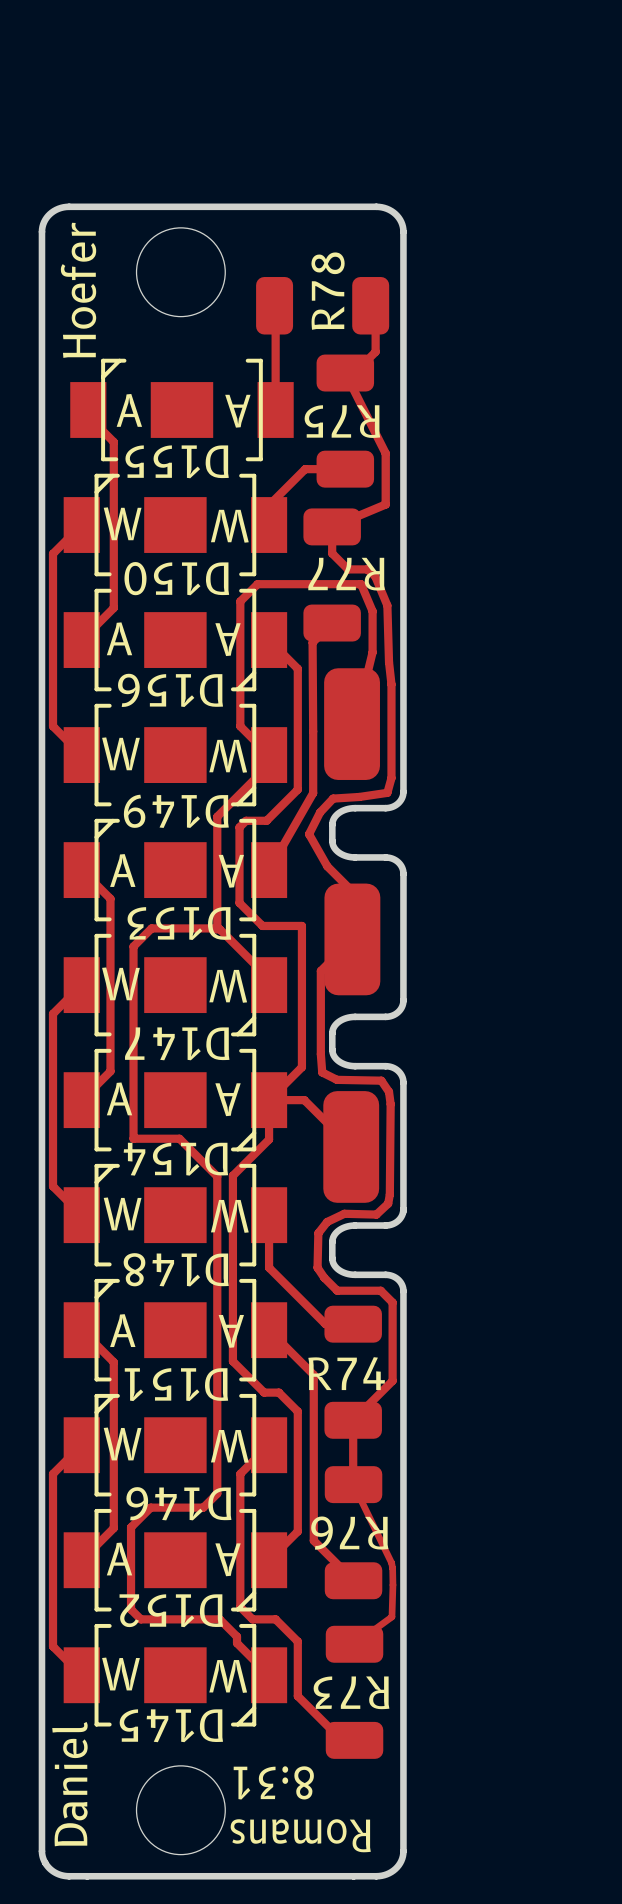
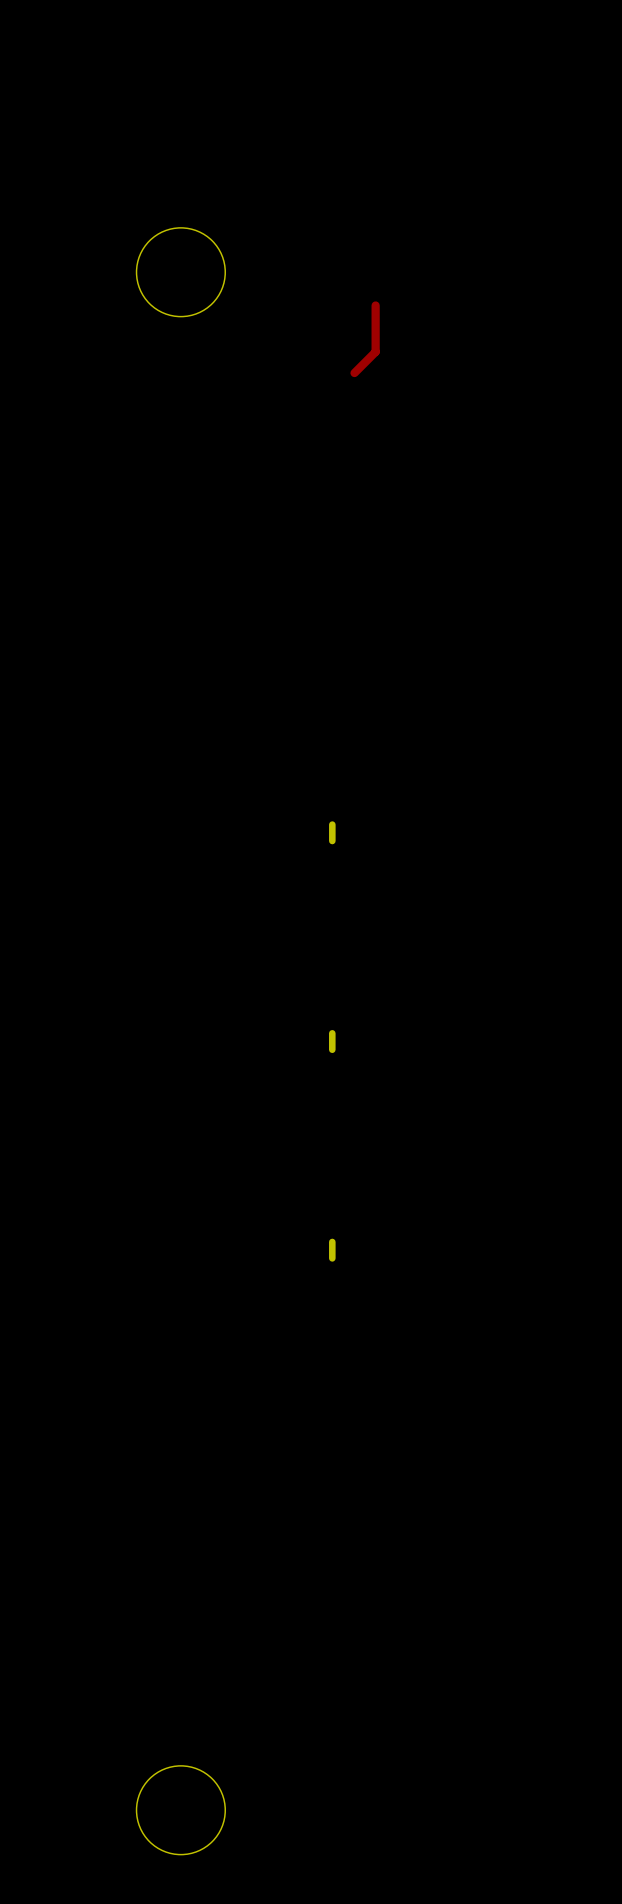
text: Hoefer (78, 290) -> none
R78: (322, 305) -> none
track: (275, 309) (275, 410) -> none
track: (345, 373) (385, 453) (385, 504) (332, 526) (332, 553) (348, 569) (367, 569) (375, 575) (387, 605) (391, 684) (391, 778) (387, 792) (333, 798) (320, 812) (309, 834) (327, 866) (352, 891) (352, 939) (320, 970) (322, 1072) (337, 1079) (381, 1080) (389, 1091) (390, 1104) (388, 1203) (376, 1214) (344, 1213) (327, 1221) (318, 1233) (317, 1267) (337, 1290) (380, 1290) (392, 1302) (392, 1380) (353, 1420) (353, 1484) -> none
track: (81, 410) (113, 442) (113, 607) (81, 640) -> none
D155: (181, 410) -> none
R75: (345, 421) -> none
track: (354, 469) (305, 469) (269, 505) (269, 525) -> none
track: (81, 525) (53, 553) (53, 726) (81, 755) -> none
D150: (175, 525) -> none
R77: (332, 574) -> none
track: (332, 623) (312, 642) (313, 793) (269, 870) -> none
D156: (175, 640) -> none
track: (269, 640) (297, 668) (297, 789) (266, 820) (246, 820) (239, 827) (239, 902) (262, 925) (301, 925) (301, 1067) (269, 1100) -> none
part: (352, 724) -> none
track: (355, 724) (372, 652) (372, 611) (361, 584) (257, 584) (240, 601) (240, 726) (269, 755) (269, 764) (217, 816) (217, 928) -> none
D149: (175, 755) -> none
board edge: (332, 824) (335, 816) (342, 810) (352, 808) (390, 807) (399, 802) (403, 793) (403, 231) (401, 222) (391, 211) (376, 206) (69, 206) (56, 209) (45, 219) (41, 231) (41, 1851) (45, 1863) (55, 1872) (65, 1876) (87, 1876) -> none
board edge: (332, 841) (335, 848) (344, 855) (389, 857) (397, 861) (402, 867) (403, 1000) -> none
track: (81, 870) (110, 898) (110, 1071) (81, 1100) -> none
D153: (175, 870) -> none
track: (217, 928) (151, 928) (133, 946) (133, 1138) (179, 1138) (217, 1176) (217, 1493) (203, 1507) (150, 1507) (131, 1527) (131, 1609) (140, 1619) (219, 1619) (237, 1636) (237, 1643) (269, 1675) -> none
track: (217, 928) (269, 978) (269, 985) -> none
part: (352, 939) -> none
track: (81, 985) (53, 1013) (53, 1186) (81, 1215) -> none
D147: (175, 985) -> none
board edge: (403, 1000) (401, 1008) (394, 1014) (346, 1018) (336, 1024) (332, 1033) -> none
board edge: (332, 1049) (335, 1057) (344, 1064) (389, 1066) (396, 1069) (402, 1076) (403, 1209) (400, 1217) (393, 1223) (346, 1226) (336, 1232) (332, 1241) -> none
D154: (175, 1100) -> none
track: (269, 1100) (269, 1139) (232, 1175) (232, 1361) (264, 1392) (278, 1392) (297, 1411) (297, 1531) (269, 1560) -> none
track: (269, 1100) (304, 1100) (351, 1146) -> none
part: (351, 1146) -> none
D148: (175, 1215) -> none
track: (269, 1215) (269, 1267) (325, 1324) (338, 1324) -> none
board edge: (332, 1258) (336, 1267) (346, 1273) (394, 1276) (401, 1283) (403, 1291) (403, 1853) (398, 1865) (389, 1873) (379, 1876) (353, 1876) -> none
track: (81, 1330) (113, 1362) (113, 1528) (81, 1560) -> none
D151: (175, 1330) -> none
track: (269, 1330) (313, 1374) (313, 1540) (353, 1580) -> none
R74: (353, 1372) -> none
track: (81, 1445) (53, 1473) (53, 1646) (81, 1675) -> none
D146: (175, 1445) -> none
track: (269, 1445) (240, 1473) (240, 1607) (252, 1619) (275, 1619) (297, 1641) (297, 1696) (339, 1737) (339, 1740) -> none
track: (353, 1484) (391, 1563) (392, 1585) (391, 1616) (354, 1644) -> none
R76: (353, 1532) -> none
D152: (175, 1560) -> none
D145: (175, 1675) -> none
R73: (354, 1692) -> none
text: 8:31 (273, 1782) -> none
text: Daniel (69, 1784) -> none
text: Romans (300, 1835) -> none
board edge: (87, 1876) (353, 1876) -> none

